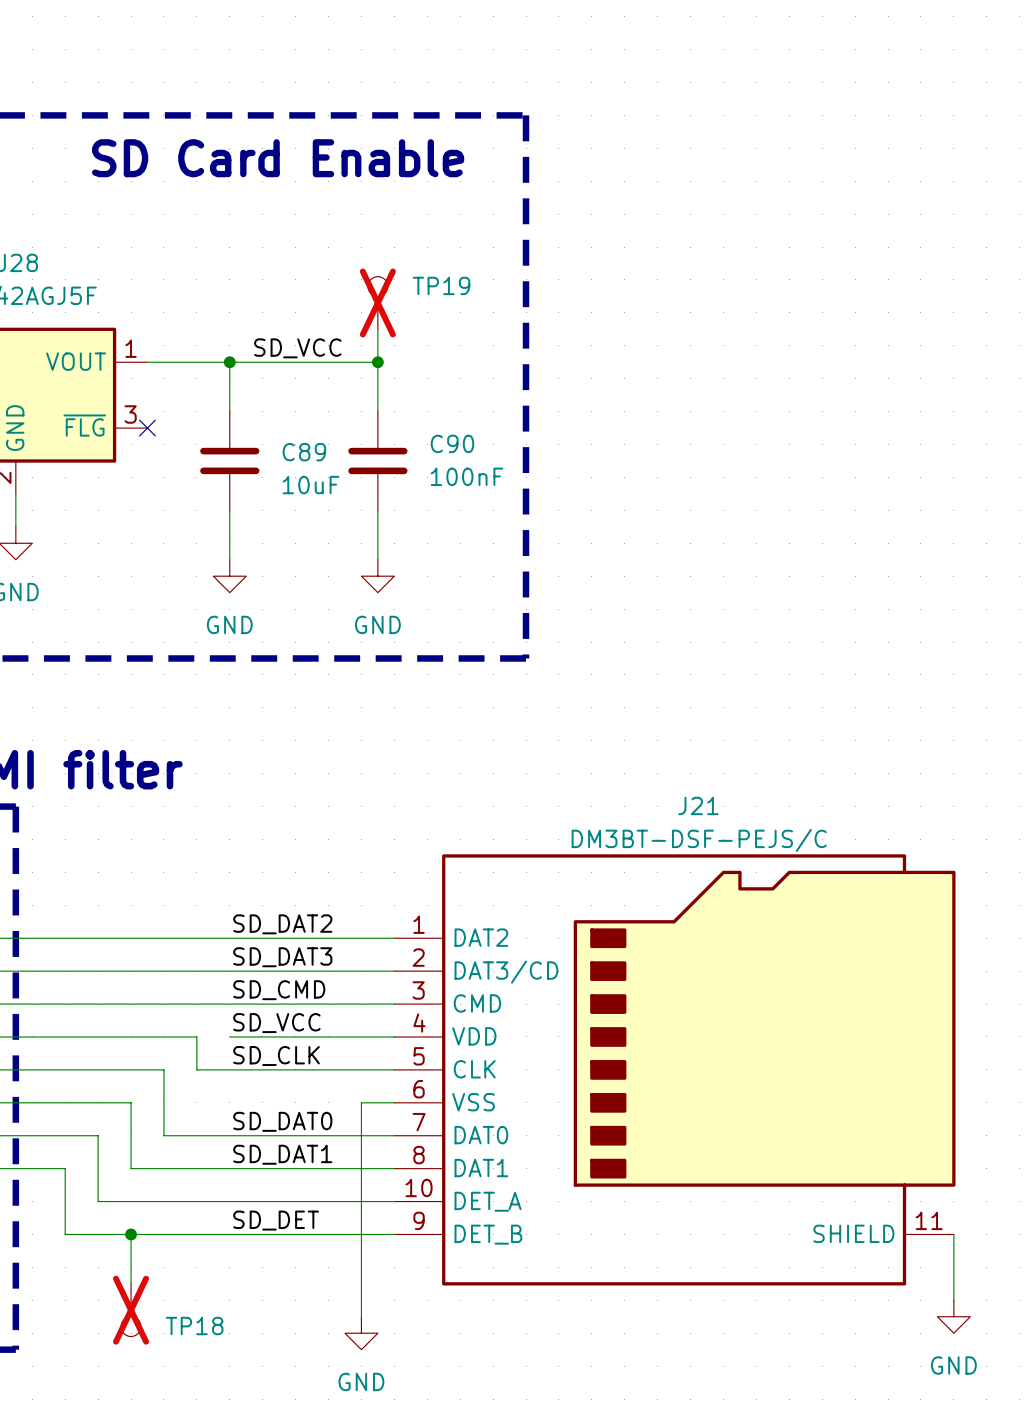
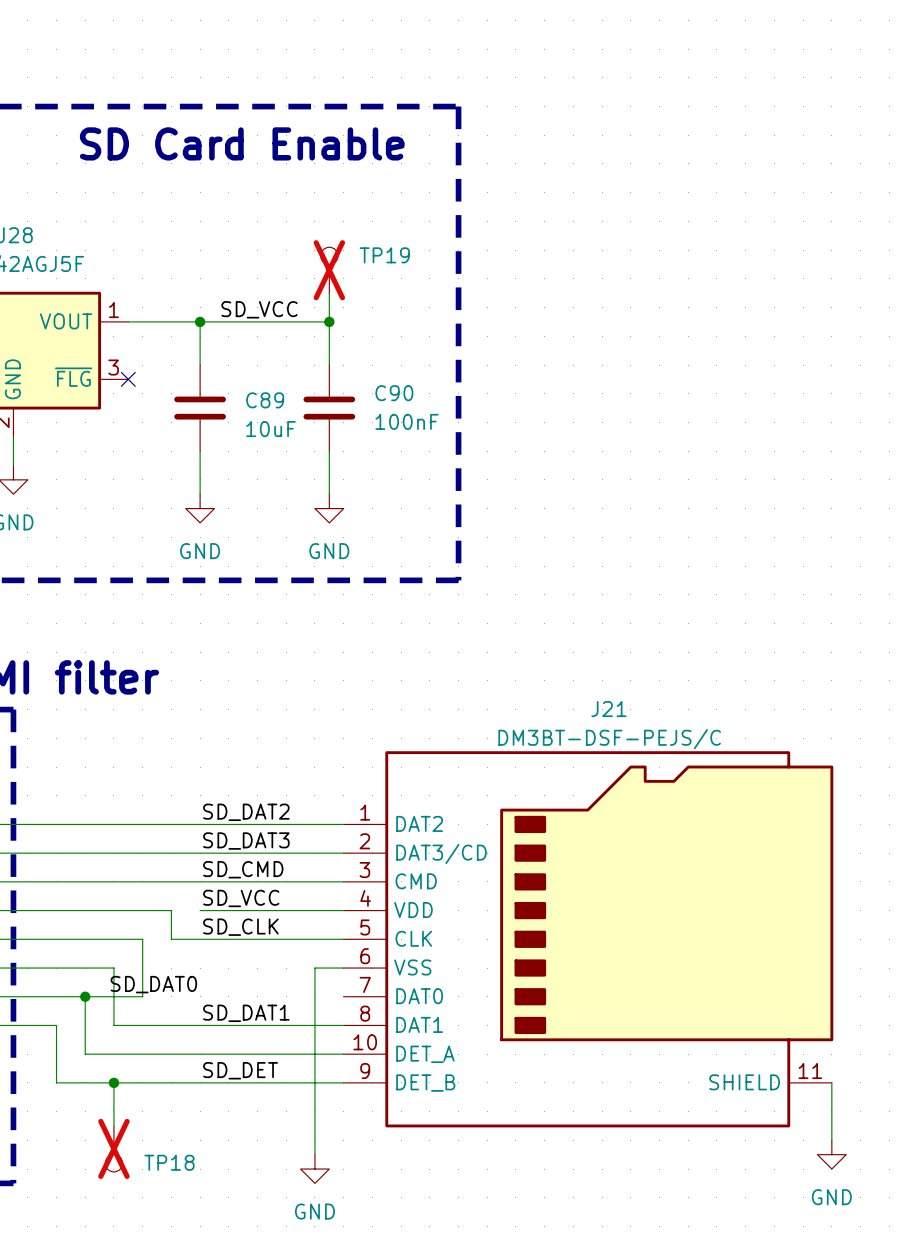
label position: SD_DAT0 (282, 1121) -> SD_DAT0 (153, 984)
junction: none -> (85, 996)
wire: (163, 1135) (394, 1135) -> (142, 996) (85, 996)

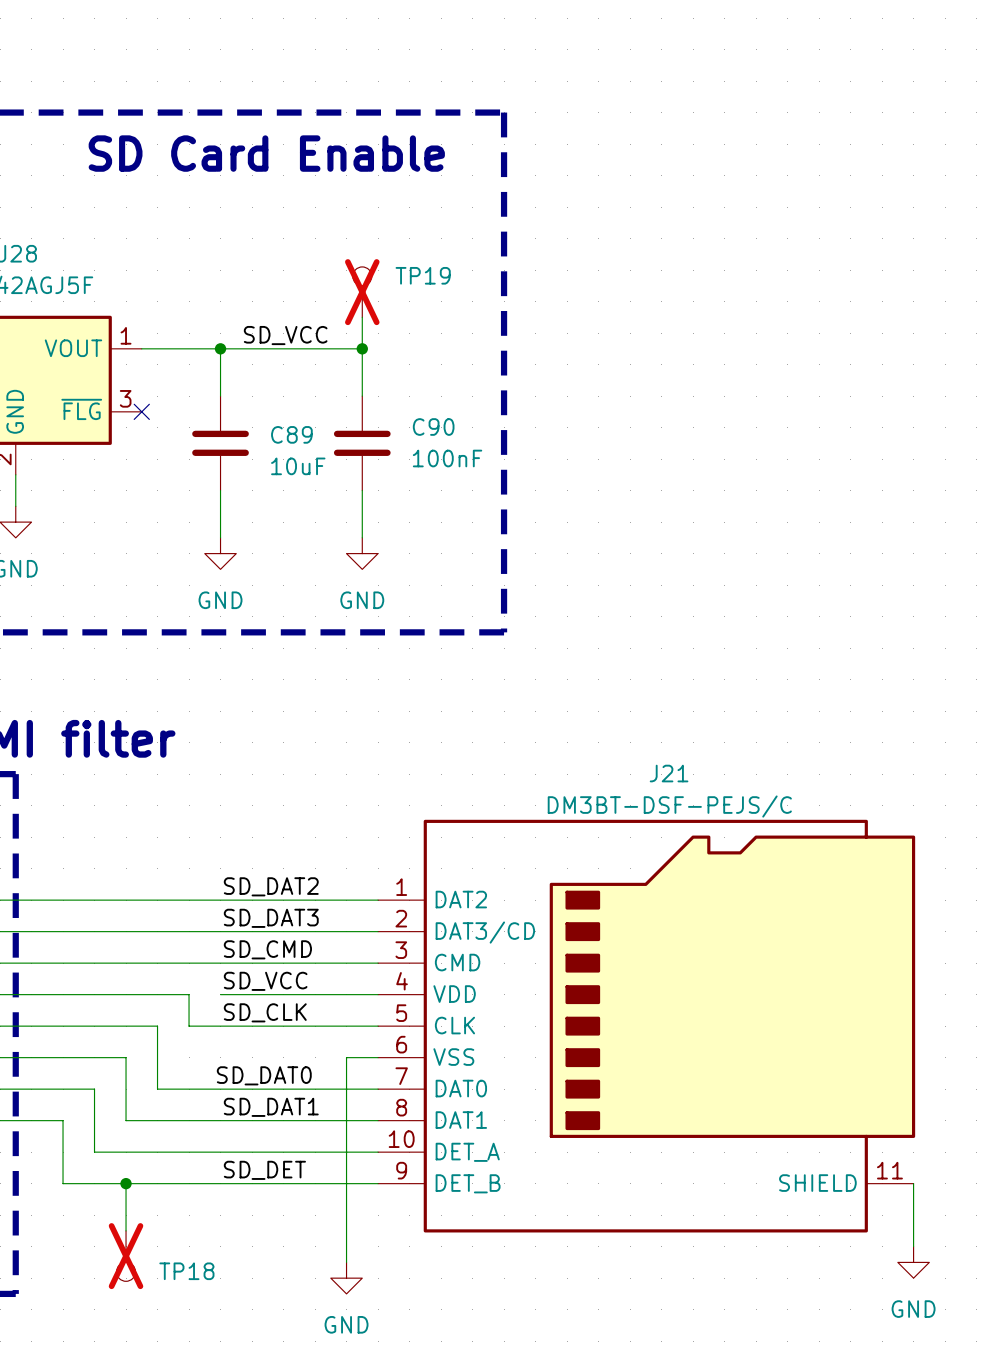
label position: SD_DAT0 (153, 984) -> SD_DAT0 (264, 1075)
wire: (85, 996) (142, 996) -> (378, 1089) (157, 1089)
junction: (85, 996) -> none

